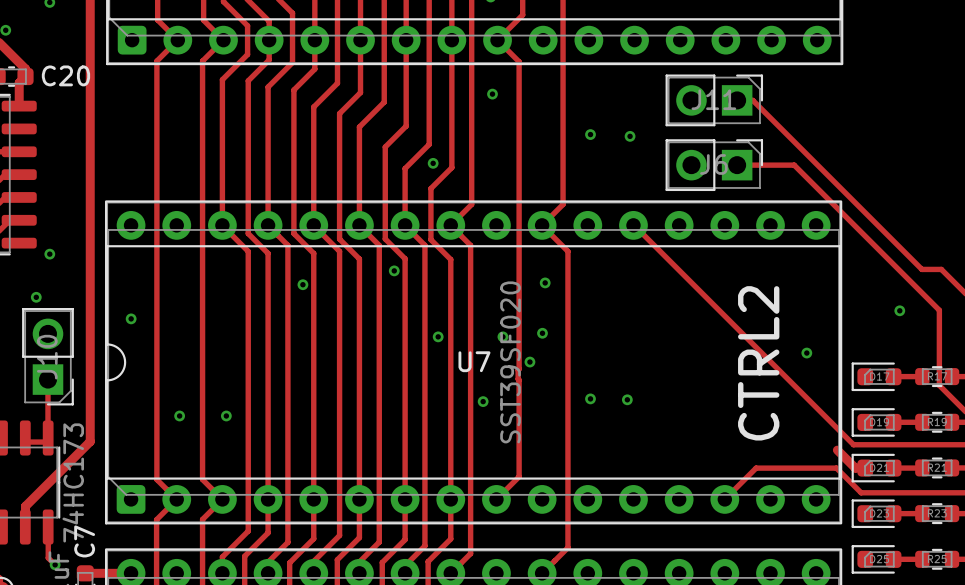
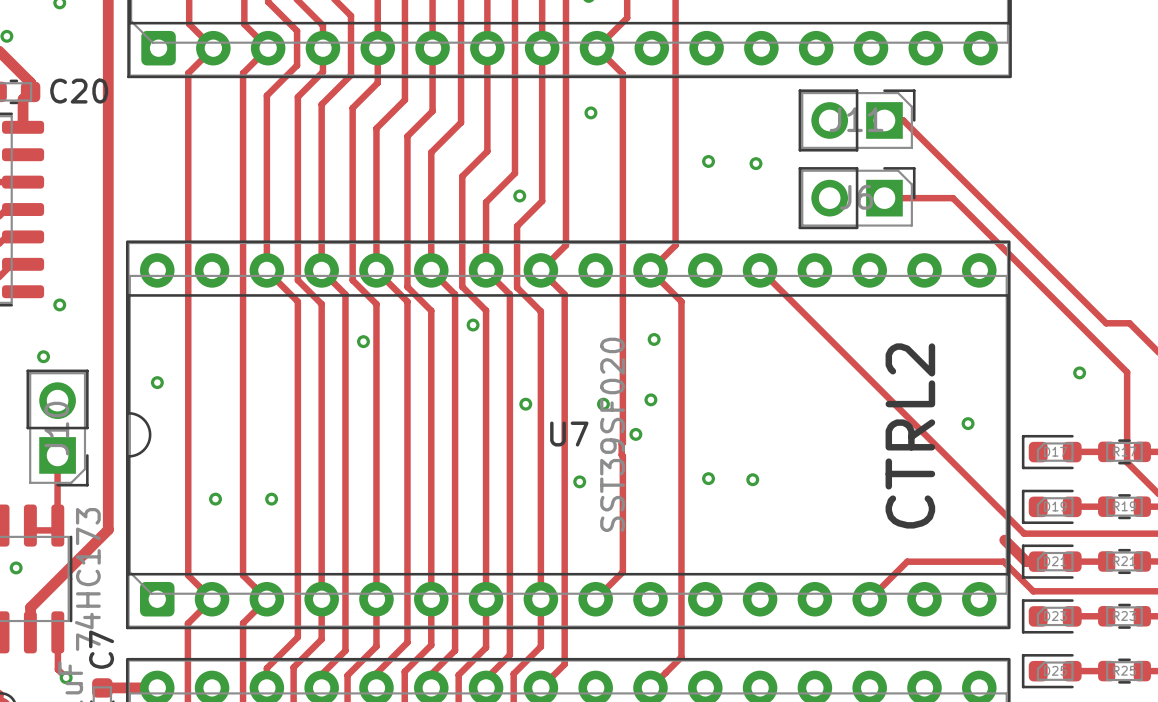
via: none -> (16, 567)

